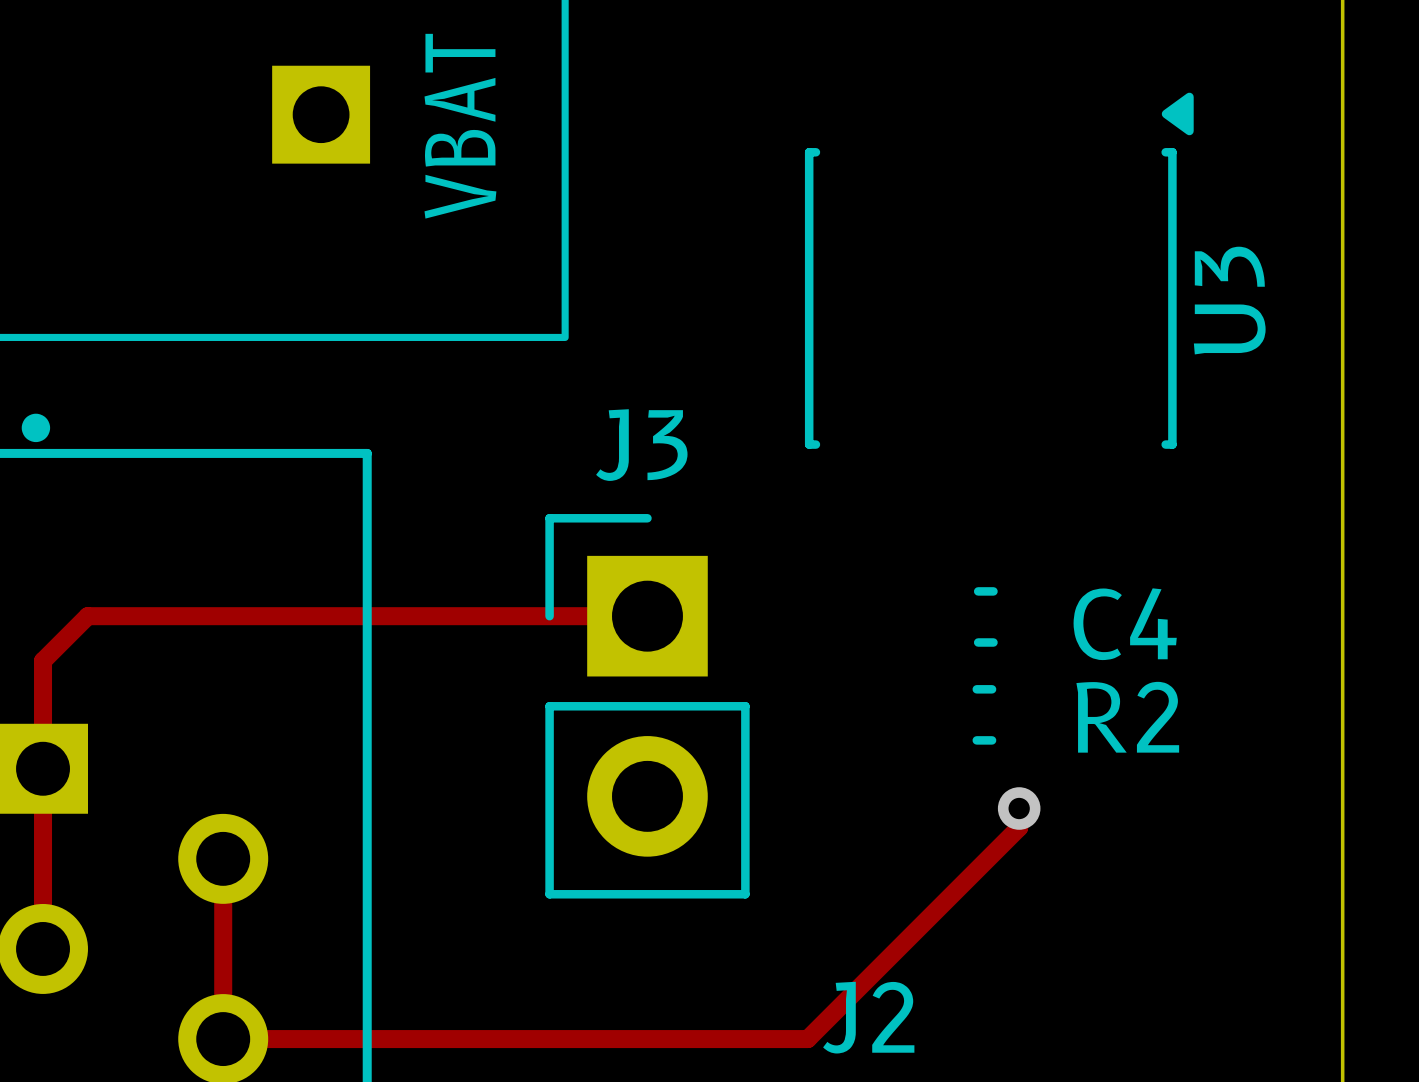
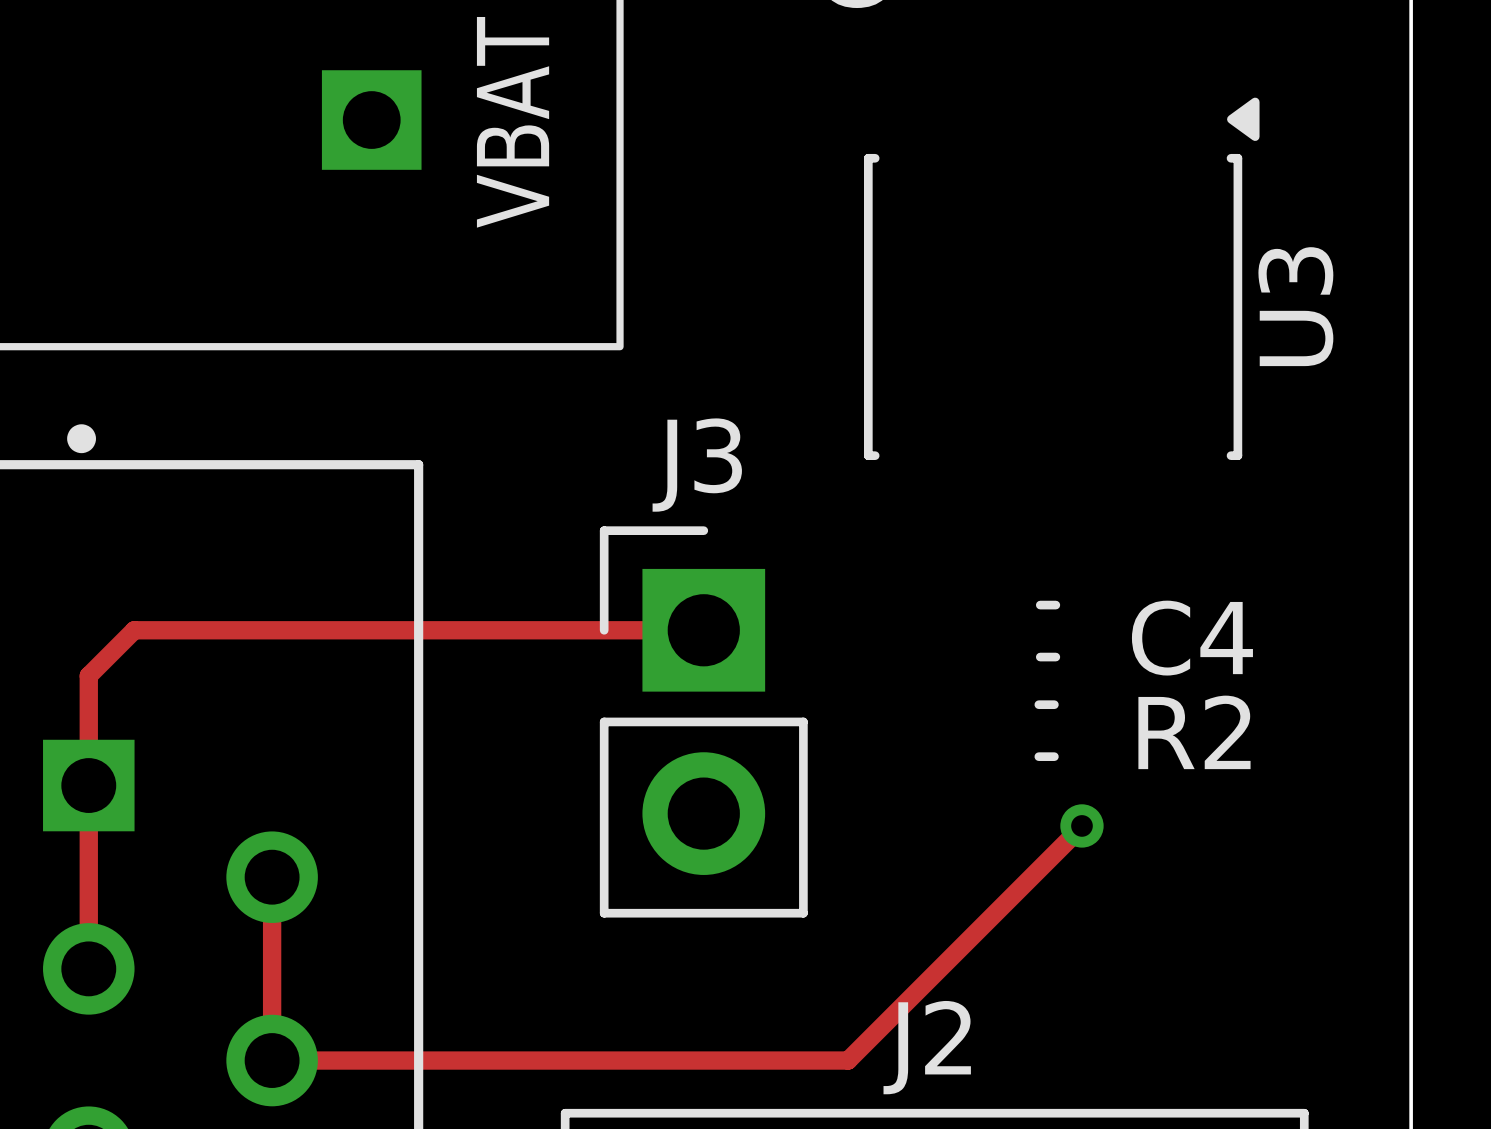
track: (1019, 809) (1019, 827) (807, 1039) (789, 1039) -> (1081, 826) (848, 1060)

